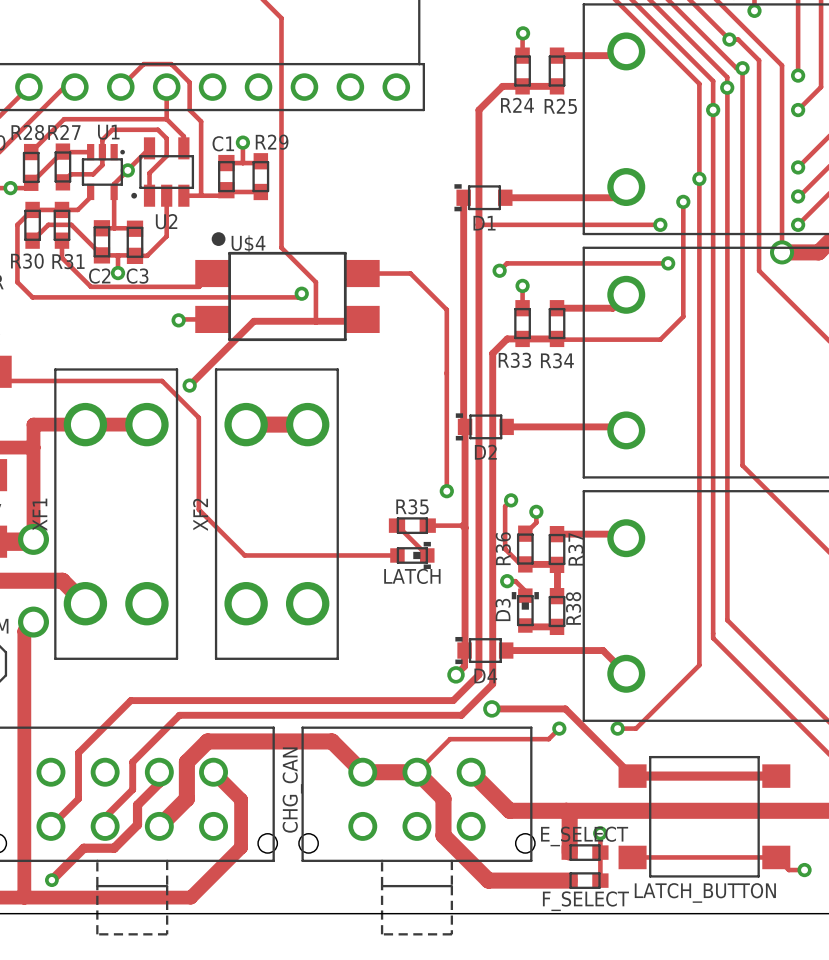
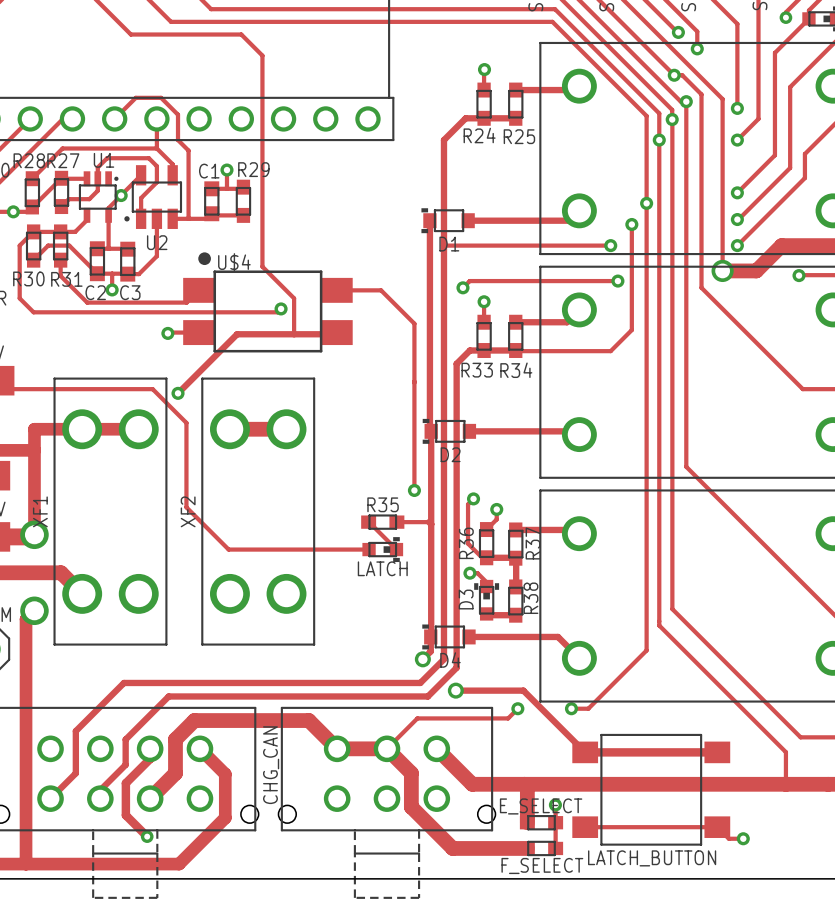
track: (137, 805) (137, 824) (114, 848) (83, 848) (51, 880) -> (130, 779) (125, 783) (125, 815) (147, 836)
via position: (51, 880) -> (147, 836)

